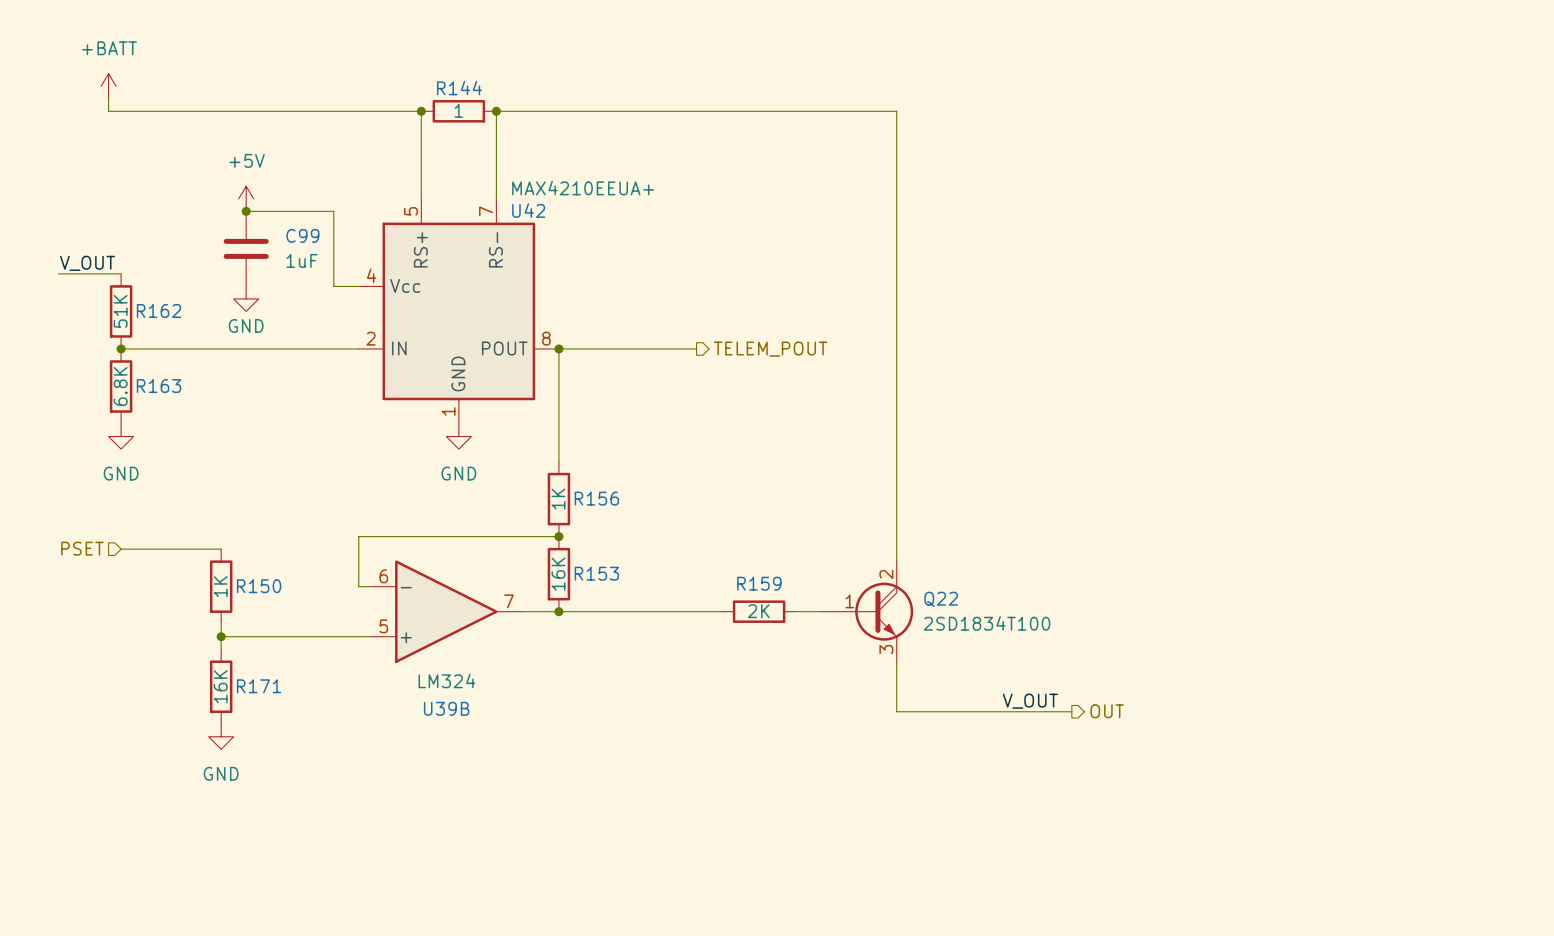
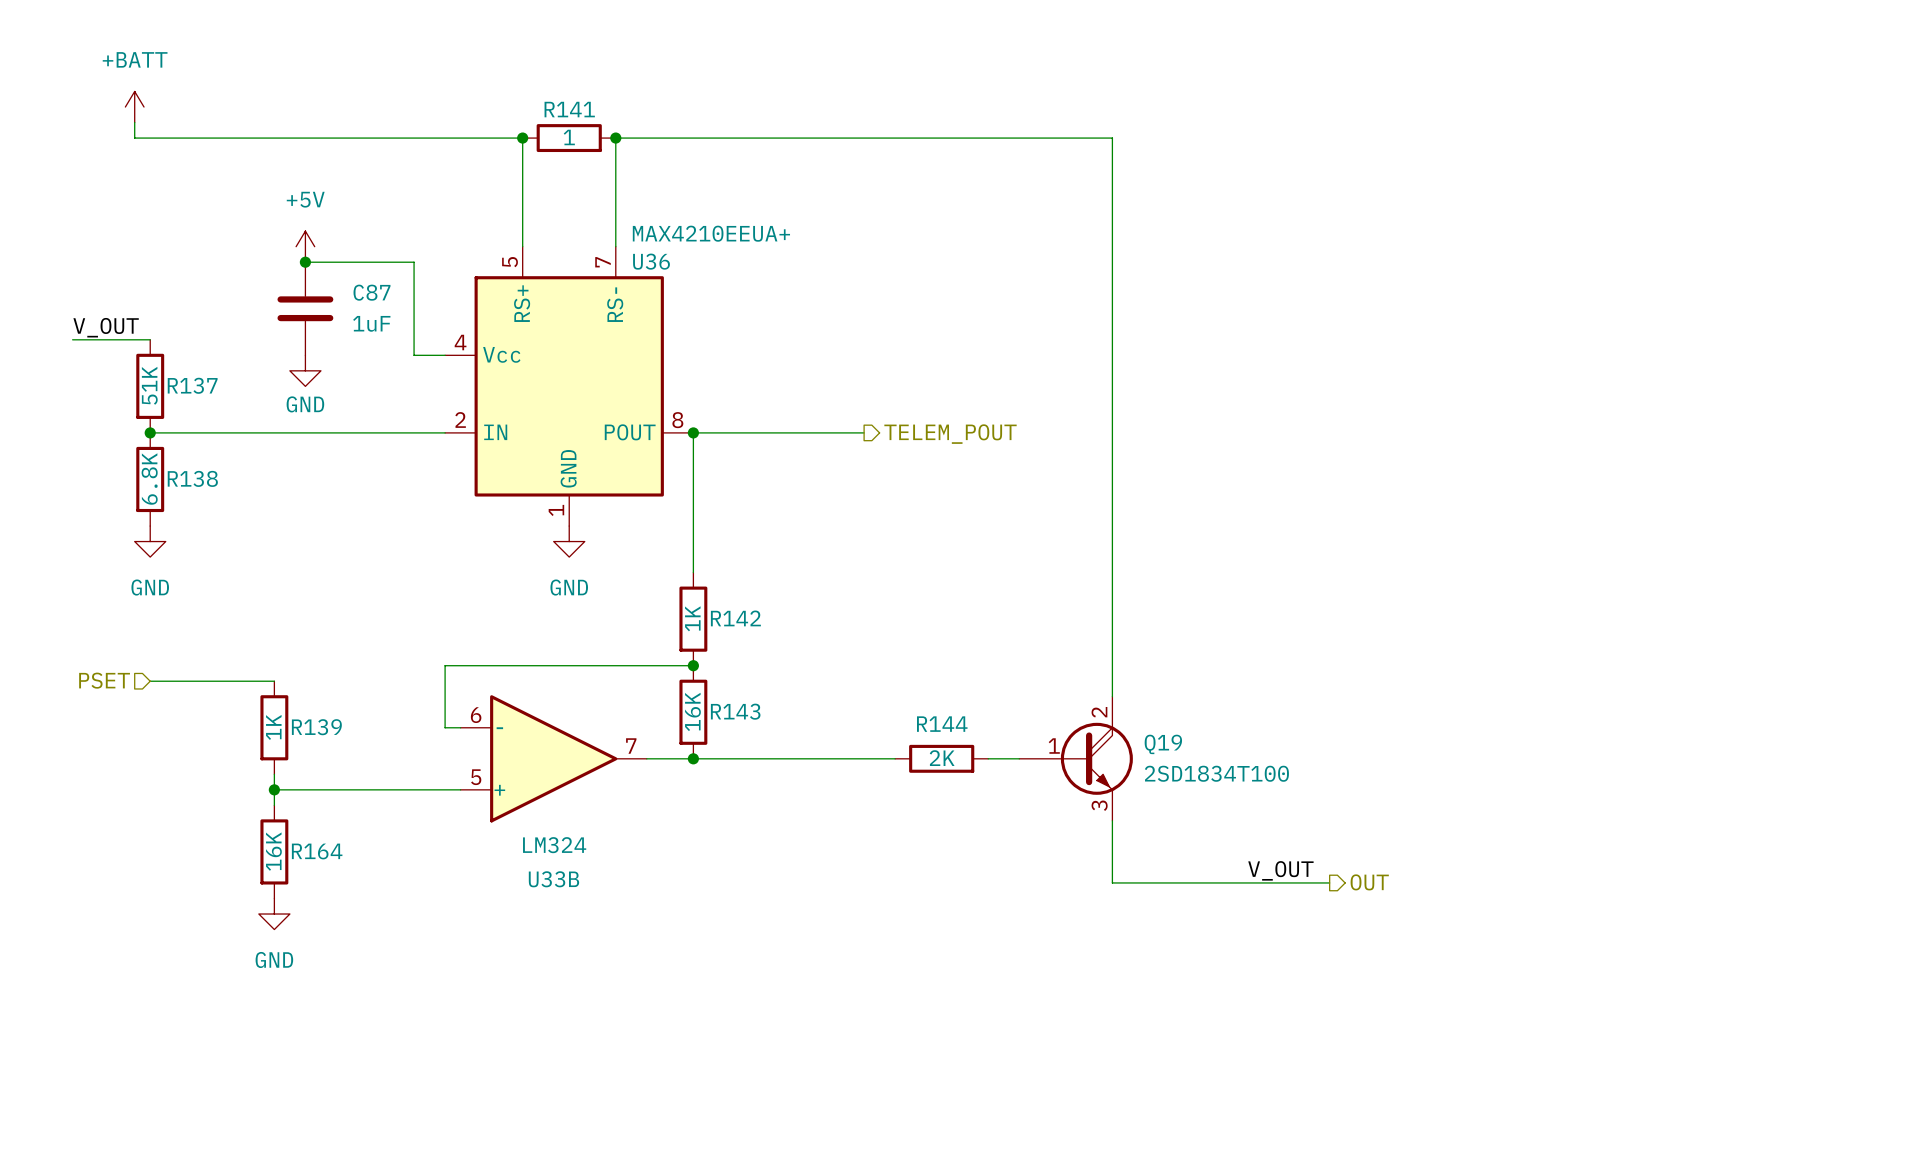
R144 name: R144 (459, 88) -> R141 (569, 109)
U42 name: U42 (528, 210) -> U36 (651, 261)
C99 name: C99 (302, 235) -> C87 (371, 292)
R162 name: R162 (159, 310) -> R137 (192, 385)
R163 name: R163 (159, 386) -> R138 (192, 478)
R156 name: R156 (596, 498) -> R142 (735, 618)
R153 name: R153 (596, 573) -> R143 (735, 711)
R159 name: R159 (759, 583) -> R144 (942, 724)
R150 name: R150 (259, 586) -> R139 (316, 727)
Q22 name: Q22 (941, 599) -> Q19 (1163, 744)
R171 name: R171 (259, 686) -> R164 (317, 851)
U39B name: U39B (446, 708) -> U33B (553, 879)

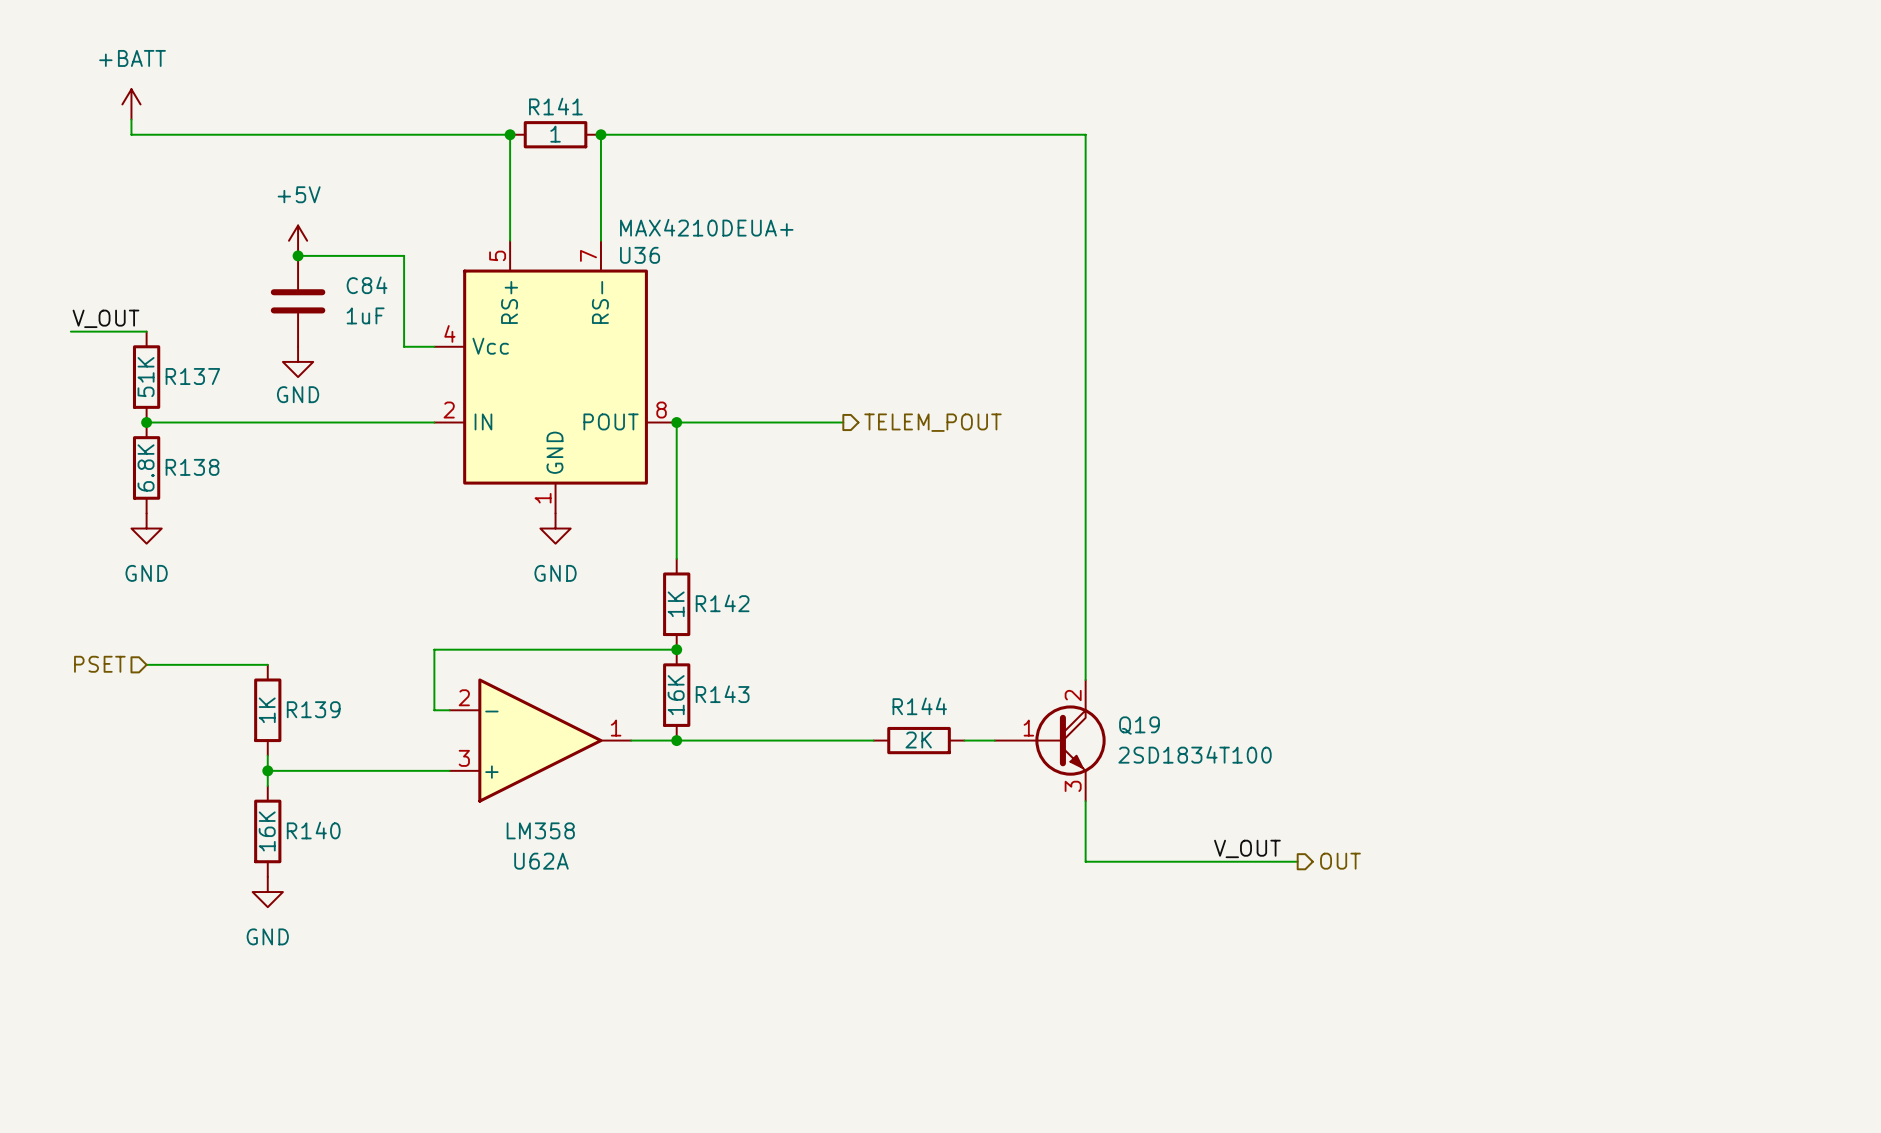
U36 value: MAX4210EEUA+ (711, 233) -> MAX4210DEUA+ (706, 227)
C87 name: C87 (371, 292) -> C84 (367, 285)
U33B pin number: 6 (476, 715) -> 2 (464, 697)
U33B pin number: 7 (631, 746) -> 1 (616, 728)
U33B pin number: 5 (476, 777) -> 3 (464, 758)
U33B value: LM324 (554, 845) -> LM358 (540, 830)
R164 name: R164 (317, 851) -> R140 (313, 830)
U33B name: U33B (553, 879) -> U62A (541, 861)

